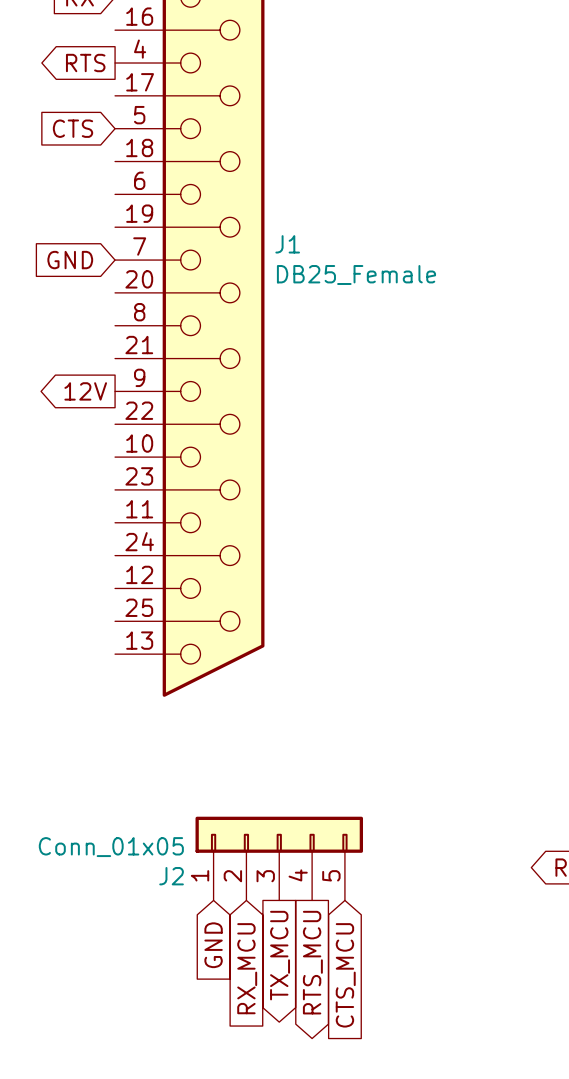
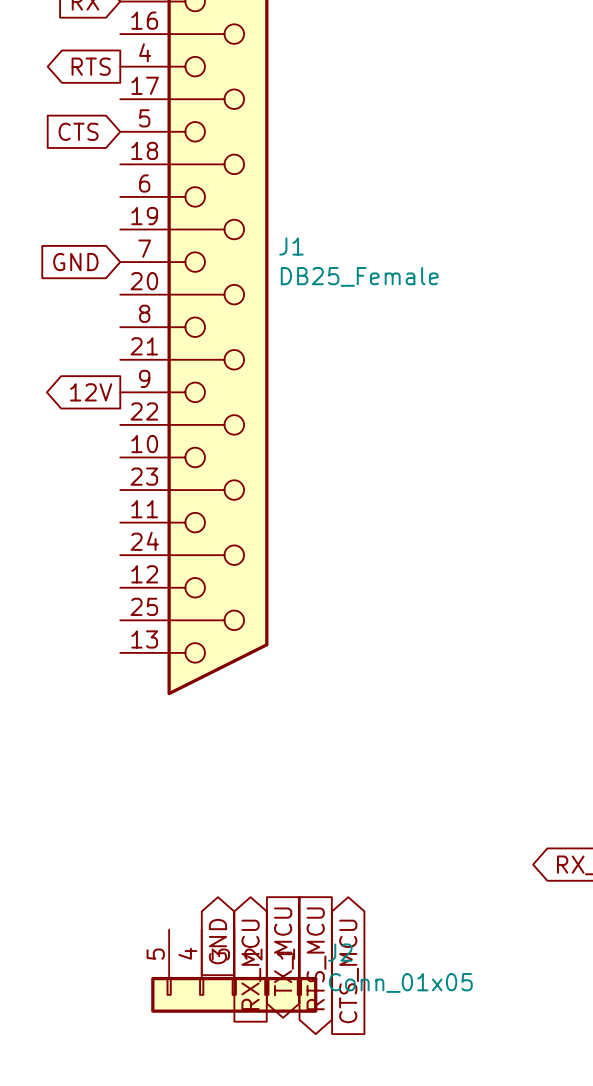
J2 rotation: 0° (279, 834) -> 180° (234, 994)
J2 position: (279, 858) -> (234, 971)

